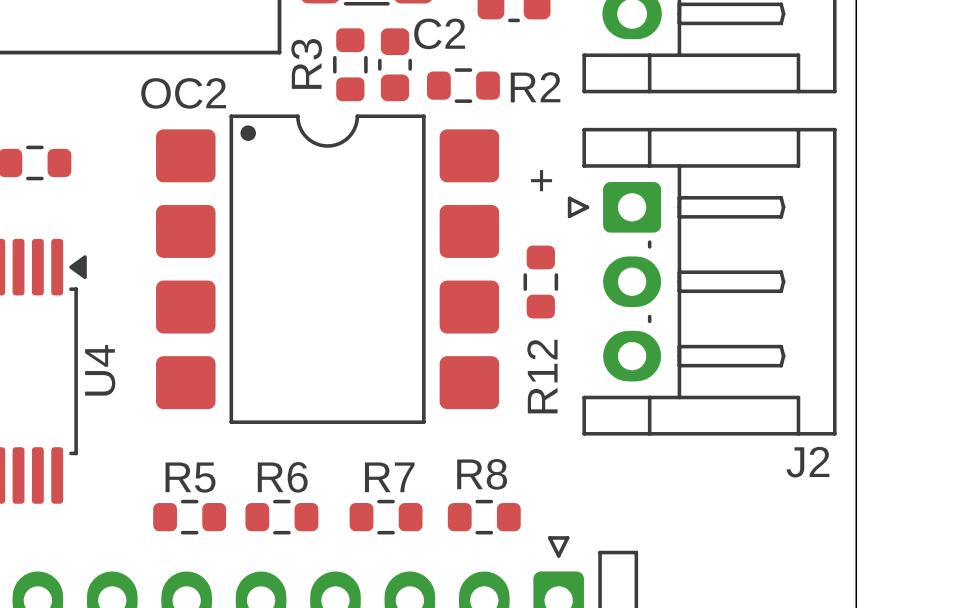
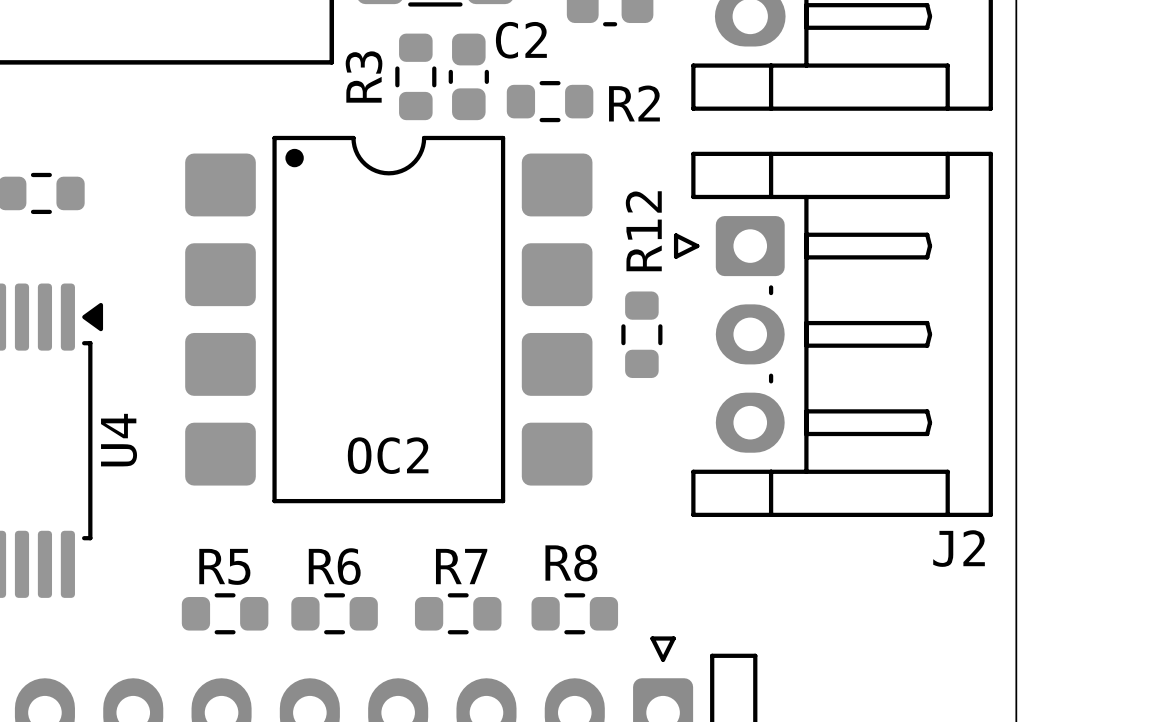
OC2 name position: OC2 (183, 93) -> OC2 (388, 455)
text: + (541, 180) -> none
R12 name position: R12 (542, 376) -> R12 (643, 231)

